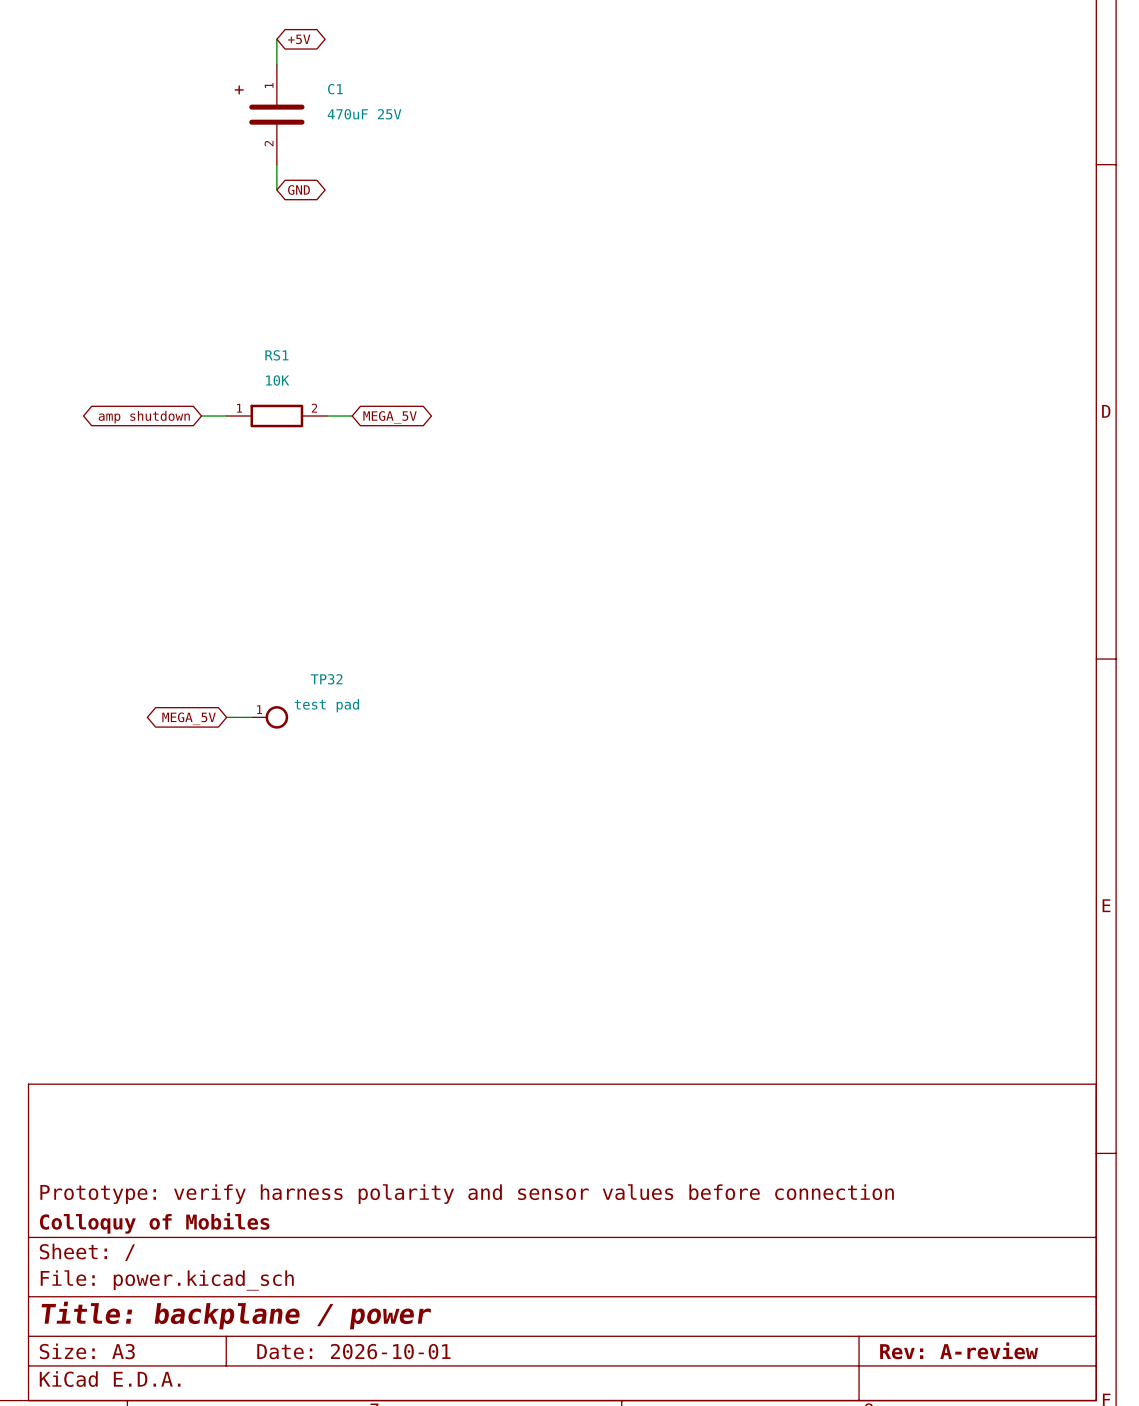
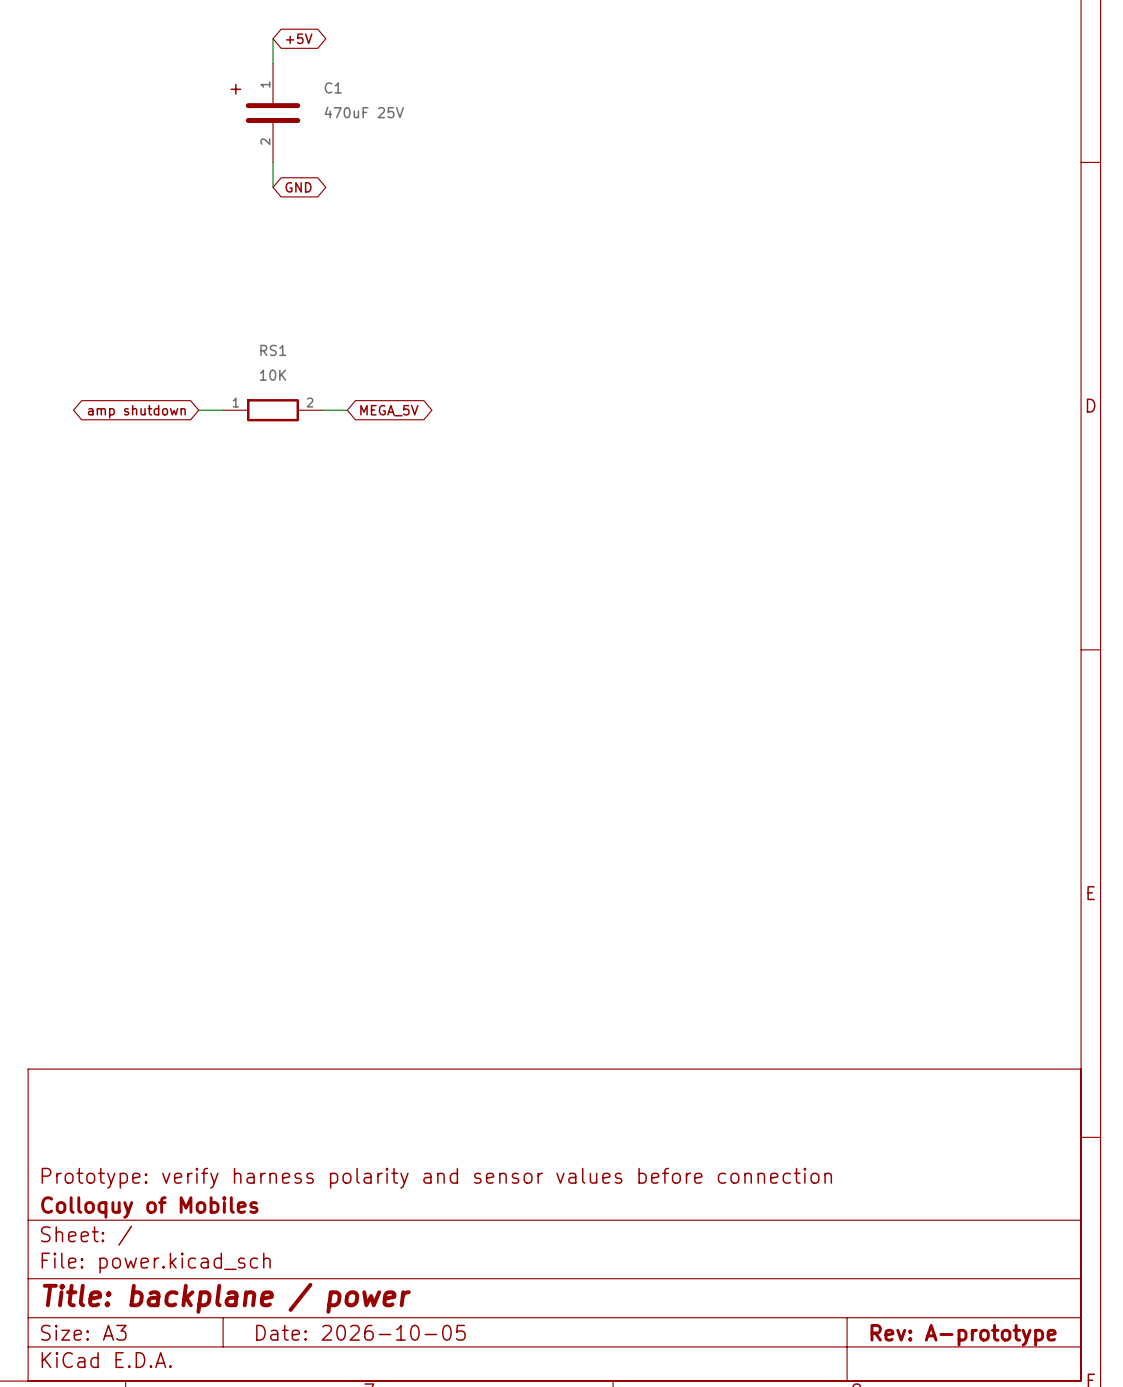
wire: (226, 717) (251, 717) -> none
TP32: test pad (269, 717) -> none
global label: MEGA_5V (189, 718) -> none
title block: Rev: A-review (959, 1350) -> Rev: A-prototype (963, 1335)
title block: Date: 2026-10-01 (353, 1351) -> Date: 2026-10-05 (360, 1332)

